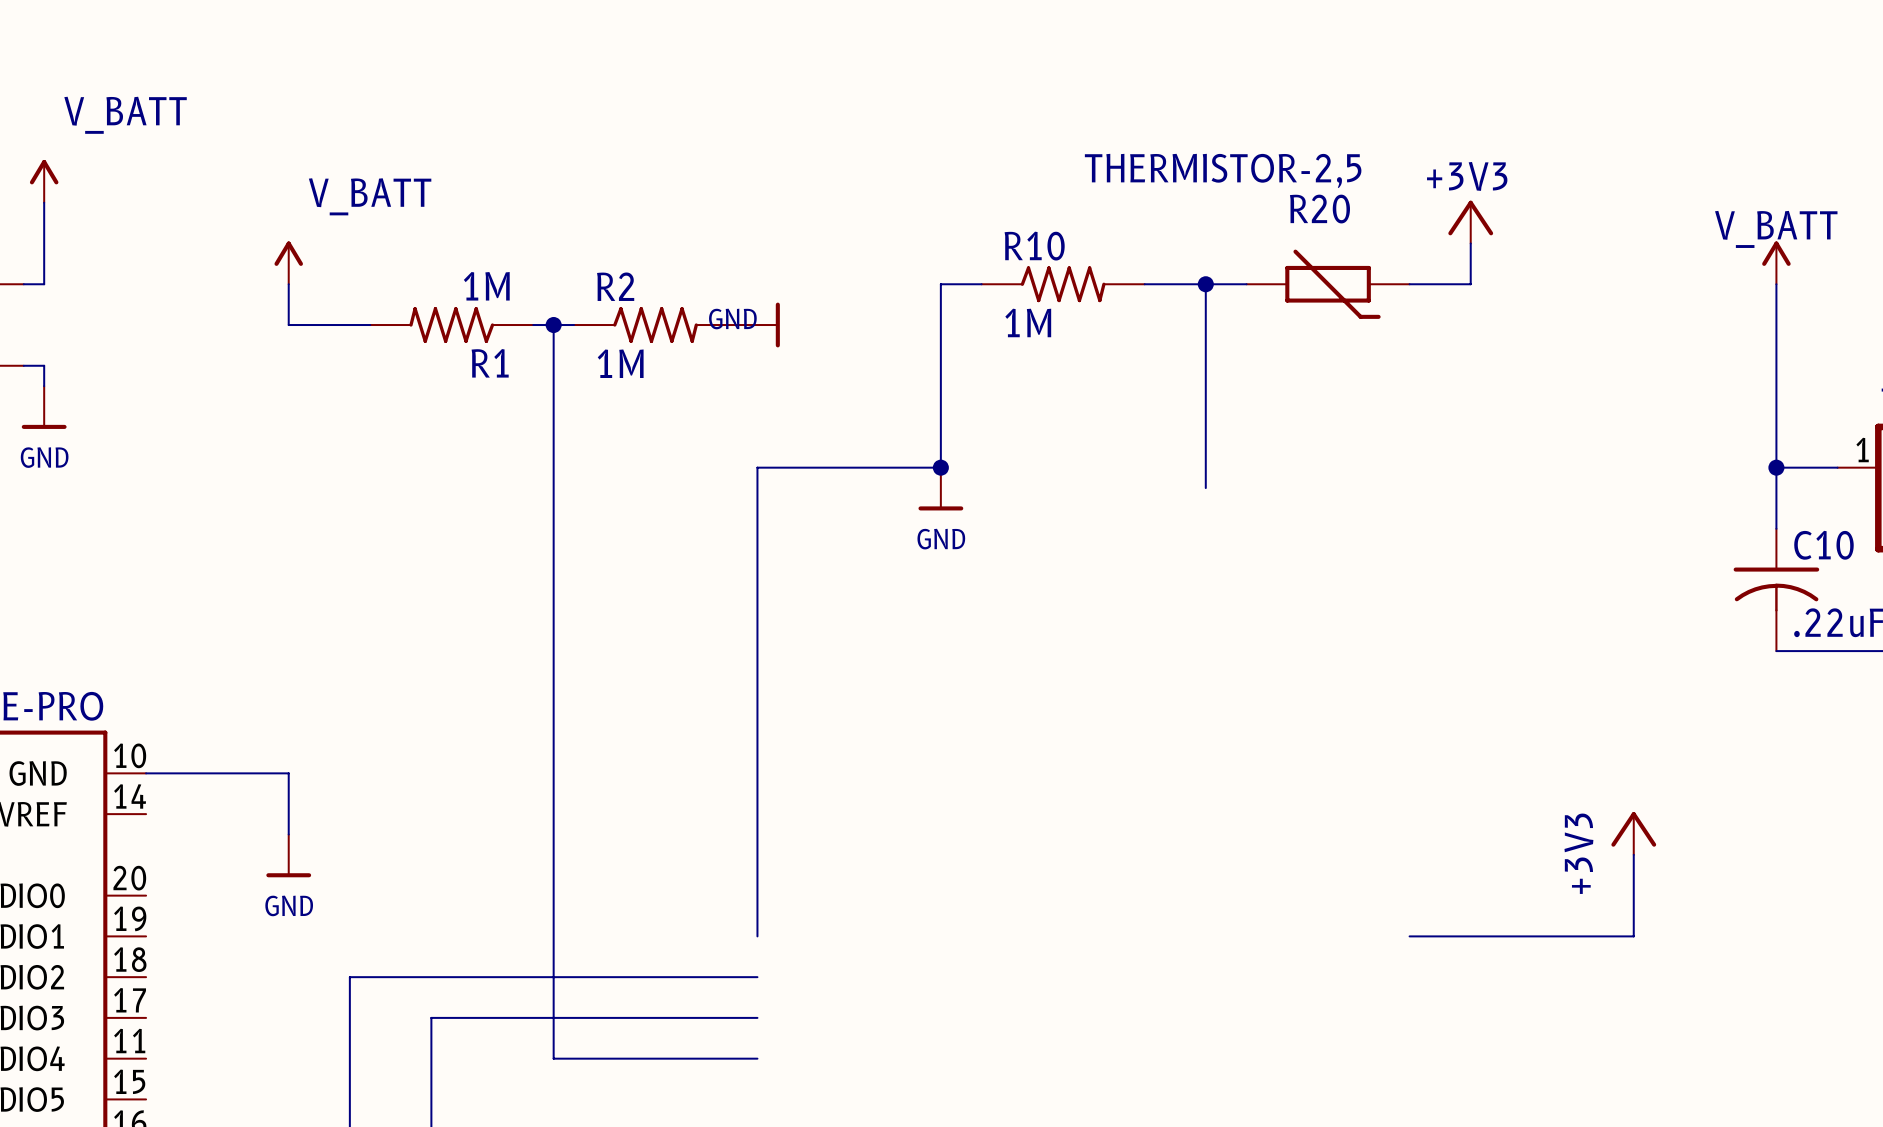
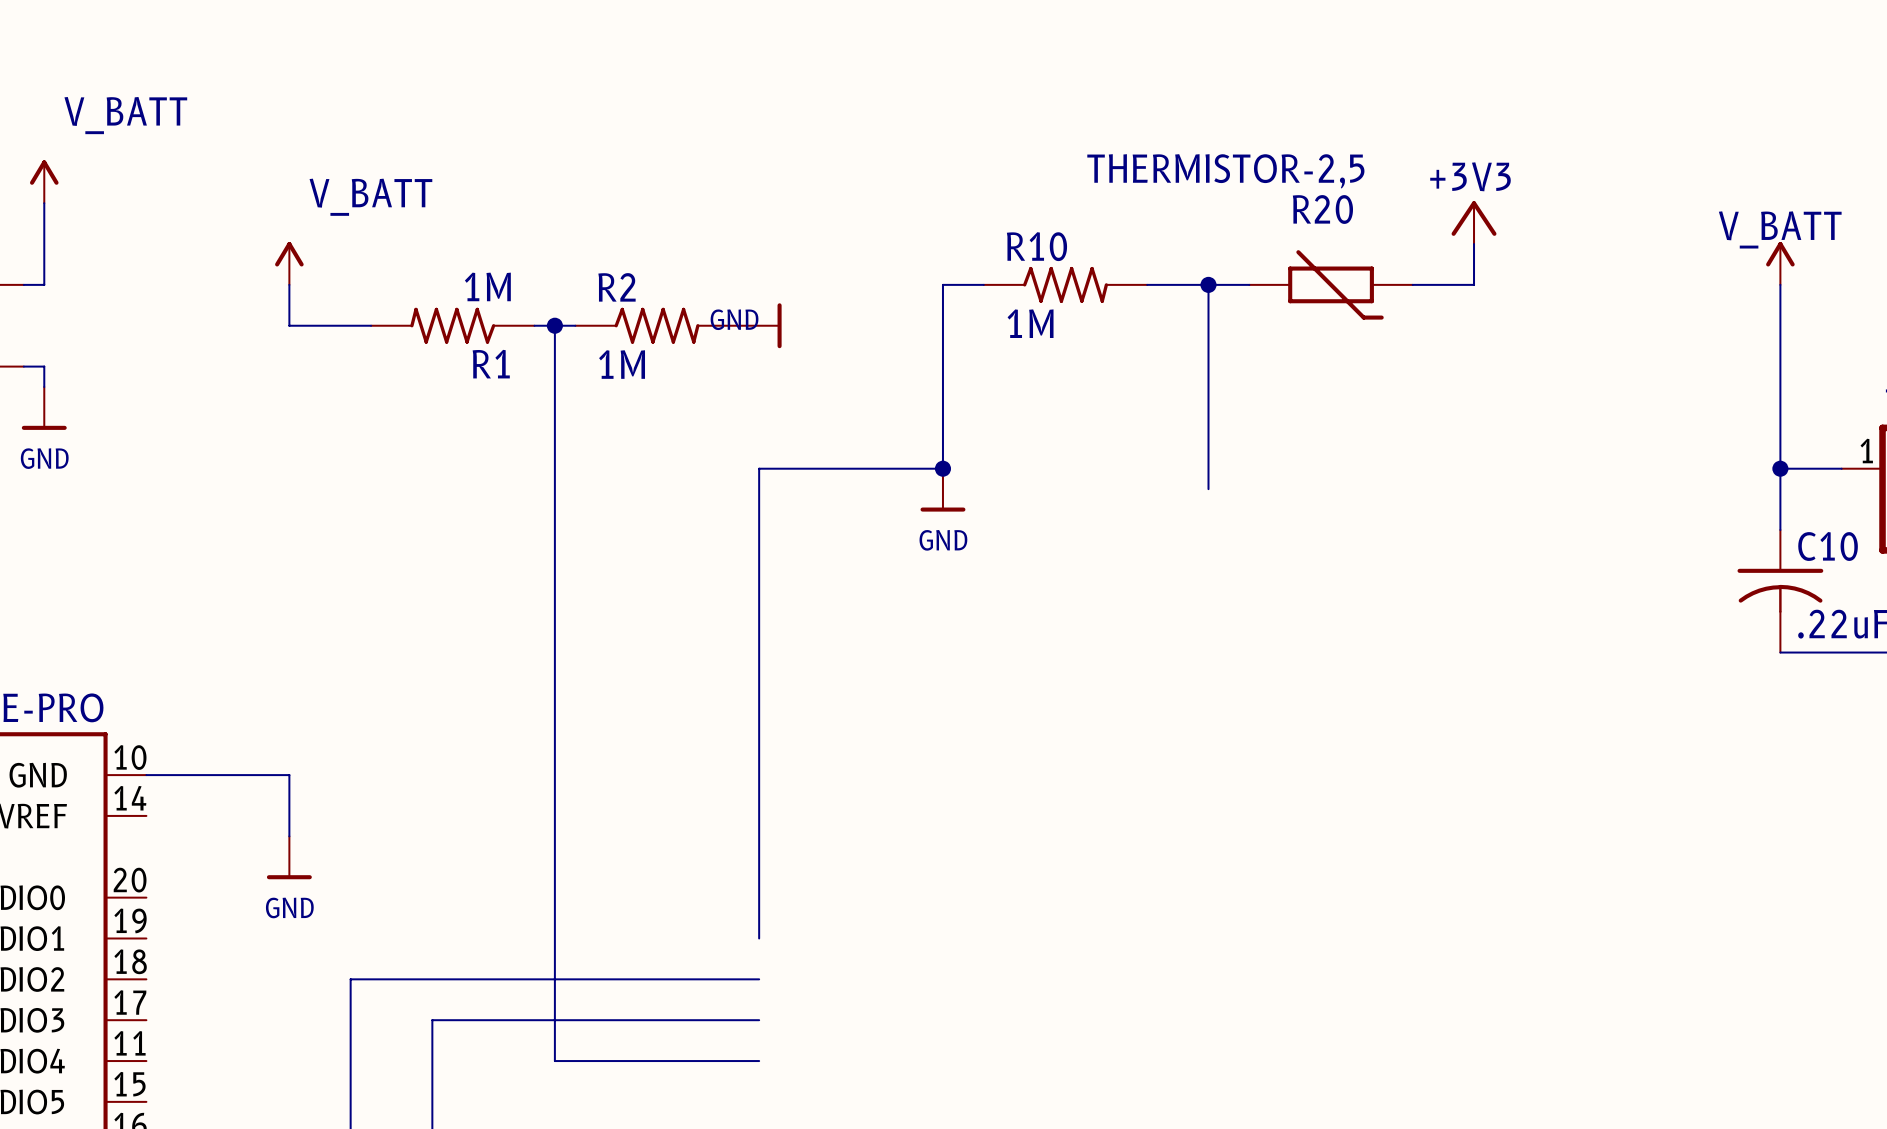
power symbol: +3V3 (1633, 833) -> none
wire: (1633, 854) (1633, 936) (1409, 936) -> none

